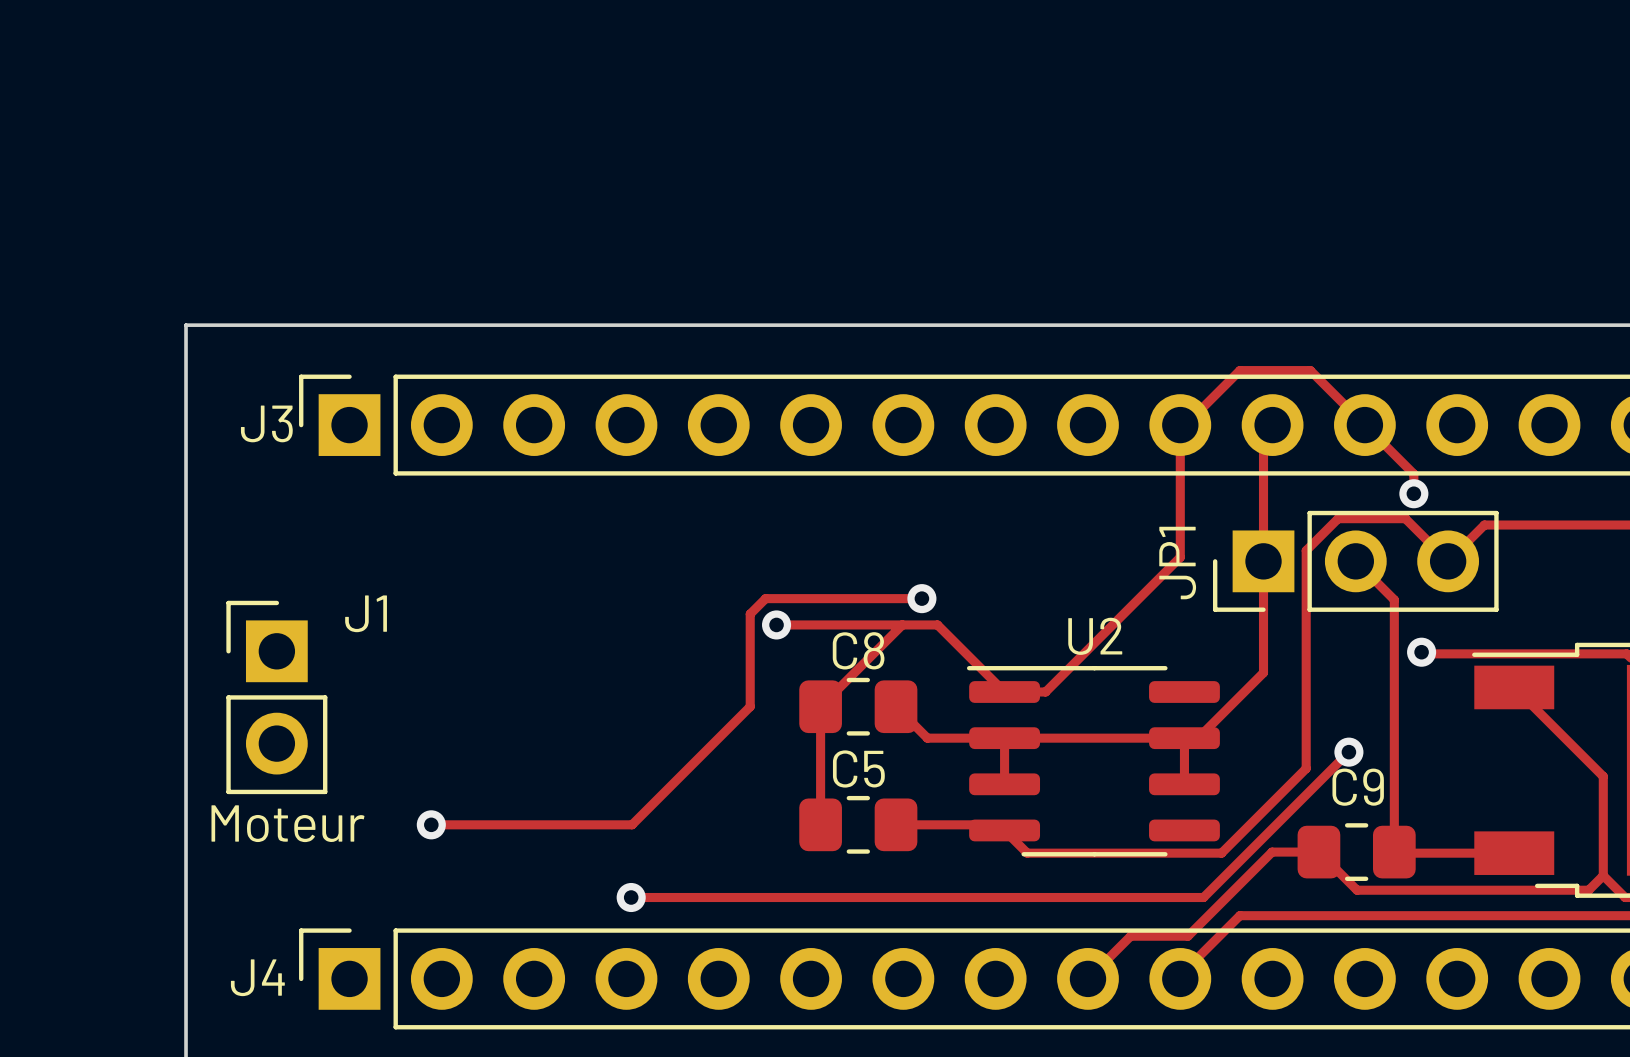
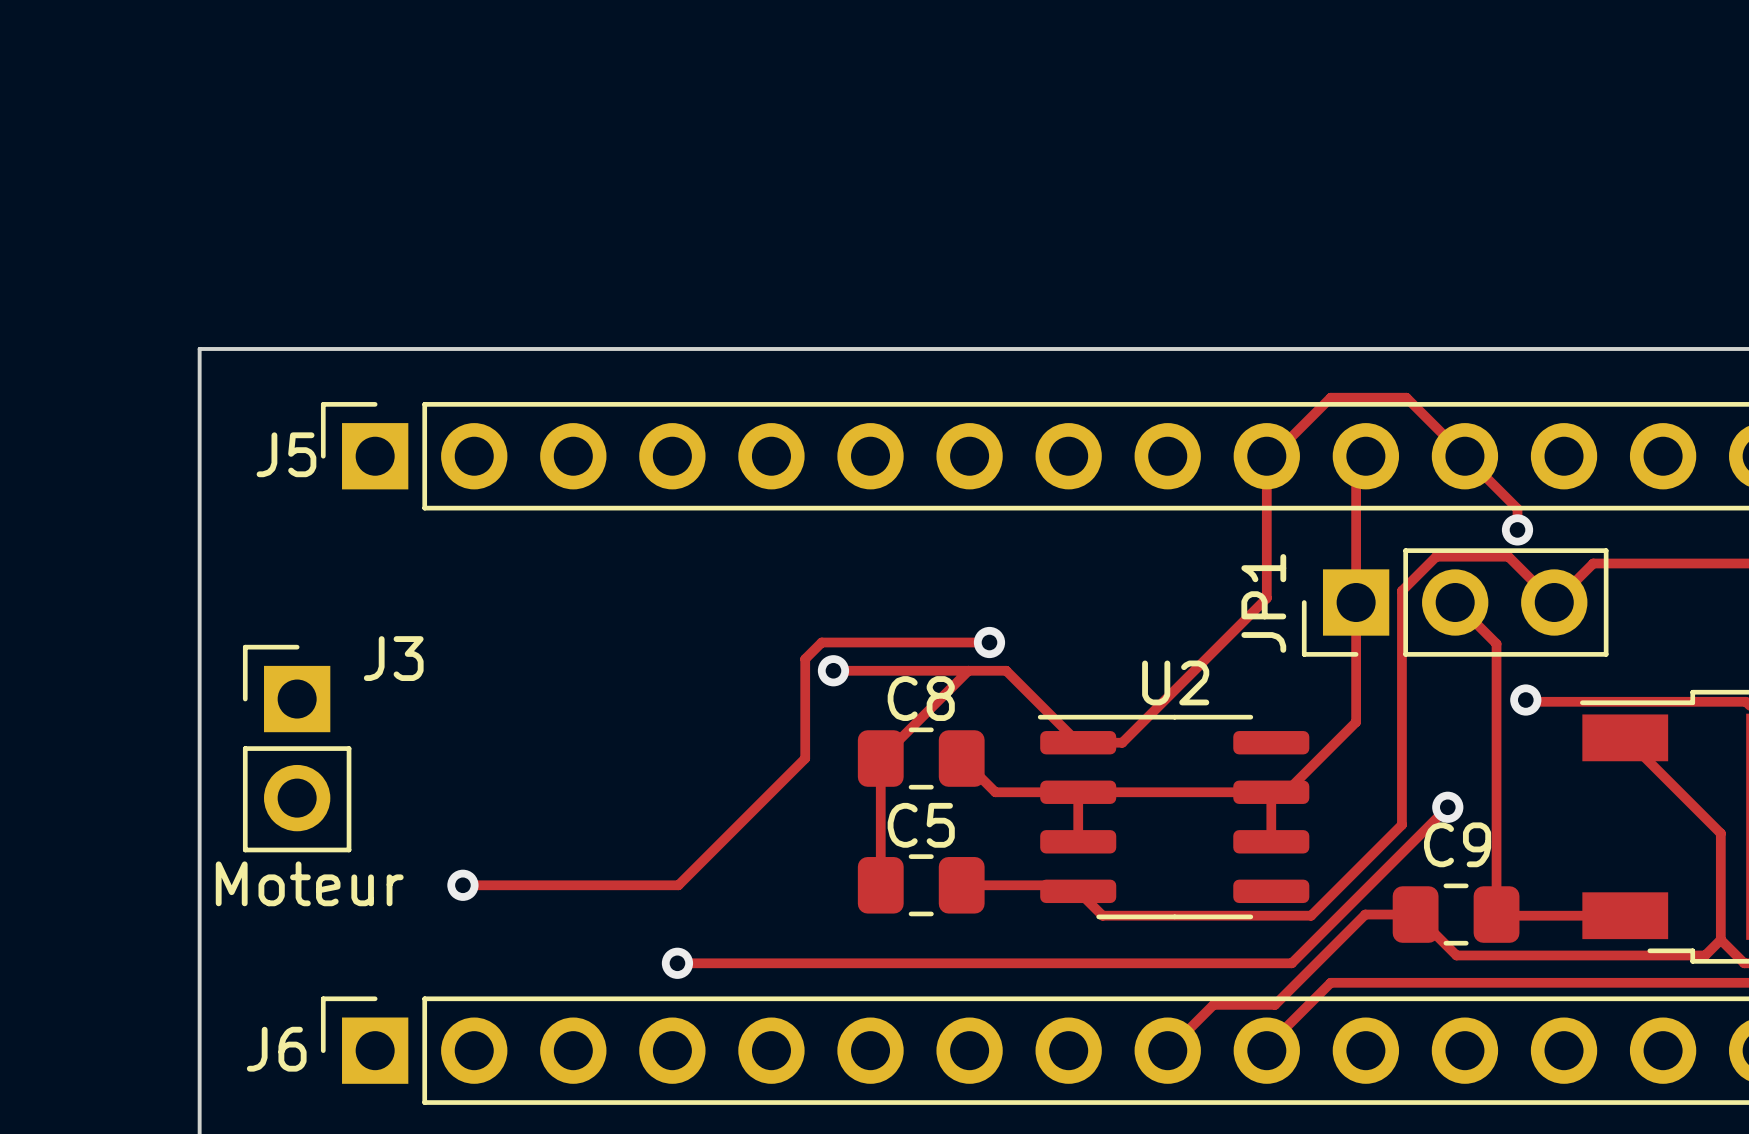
J3 name: J3 (266, 423) -> J5 (286, 454)
J1 name: J1 (366, 613) -> J3 (393, 658)
J4 name: J4 (257, 977) -> J6 (276, 1049)

